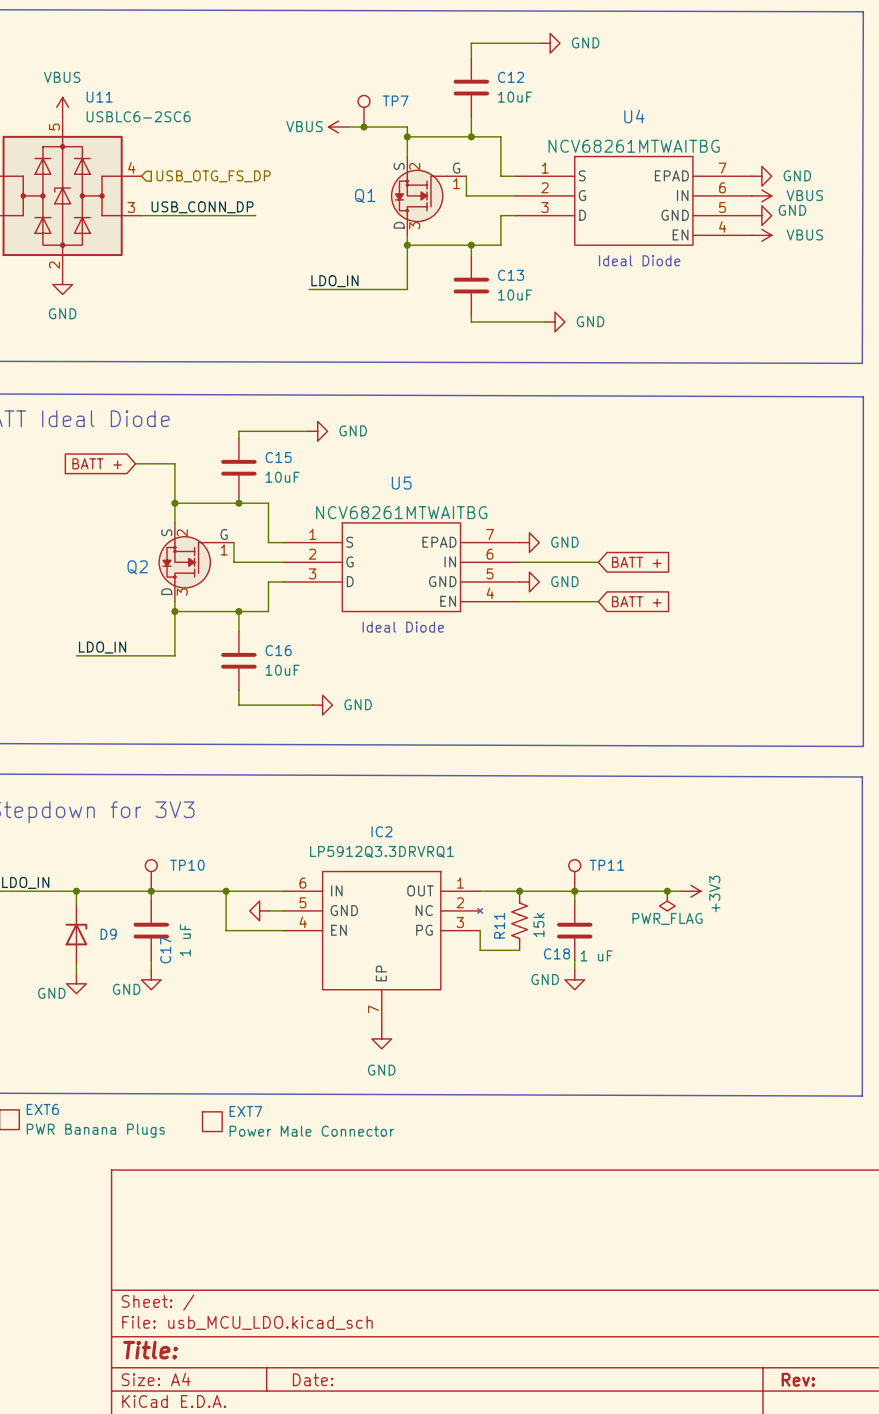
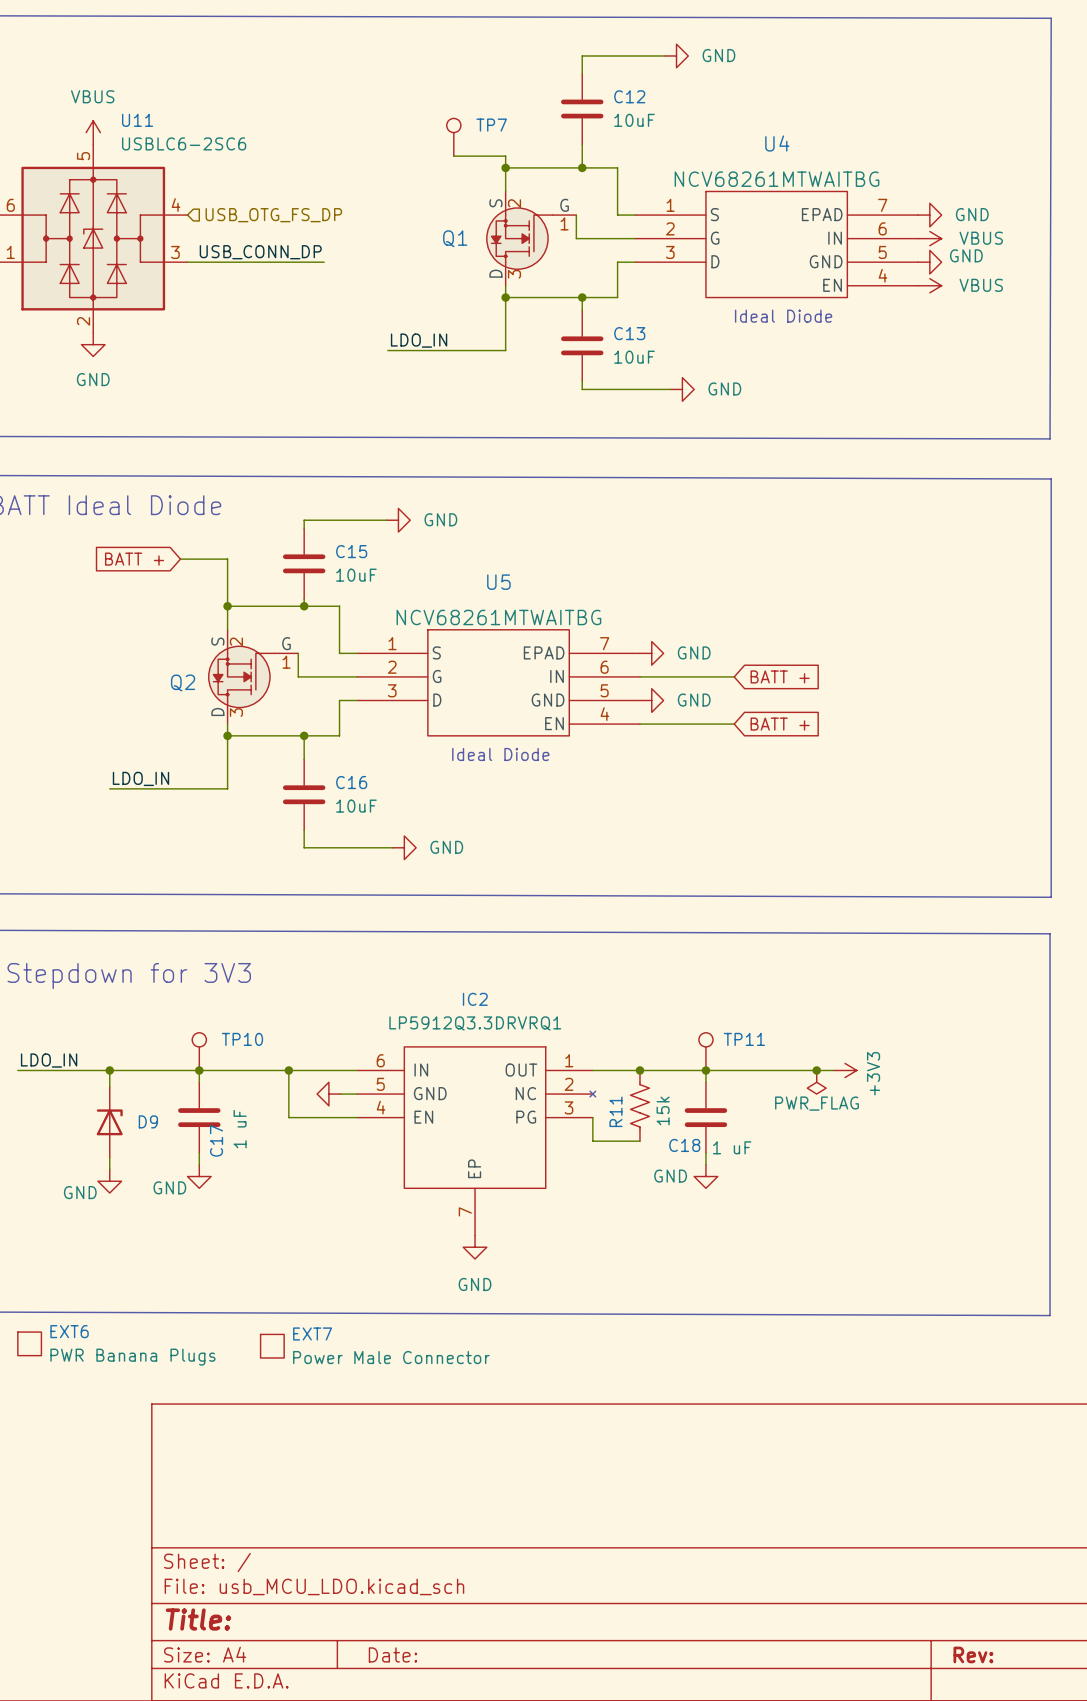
power symbol: VBUS (338, 127) -> none
wire: (348, 127) (363, 127) -> none
junction: (363, 127) -> none

